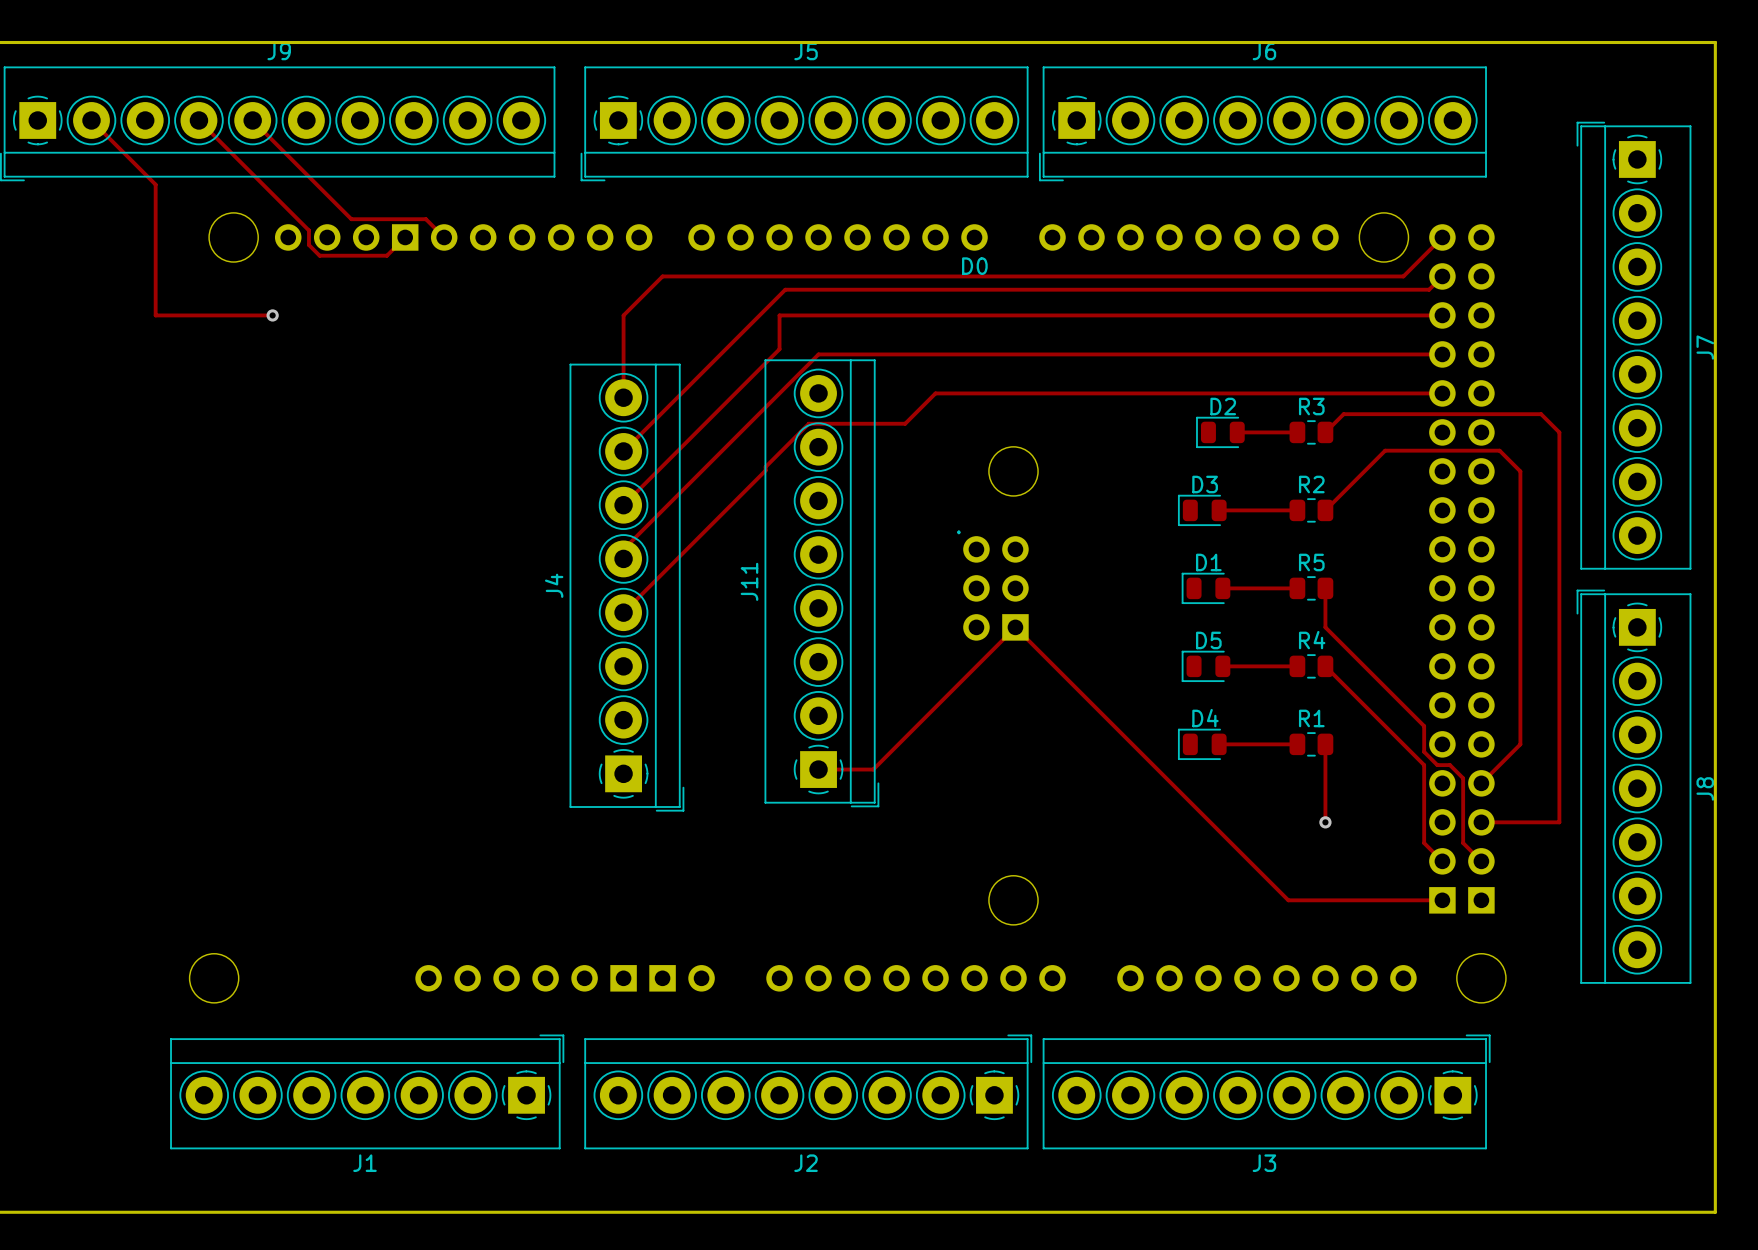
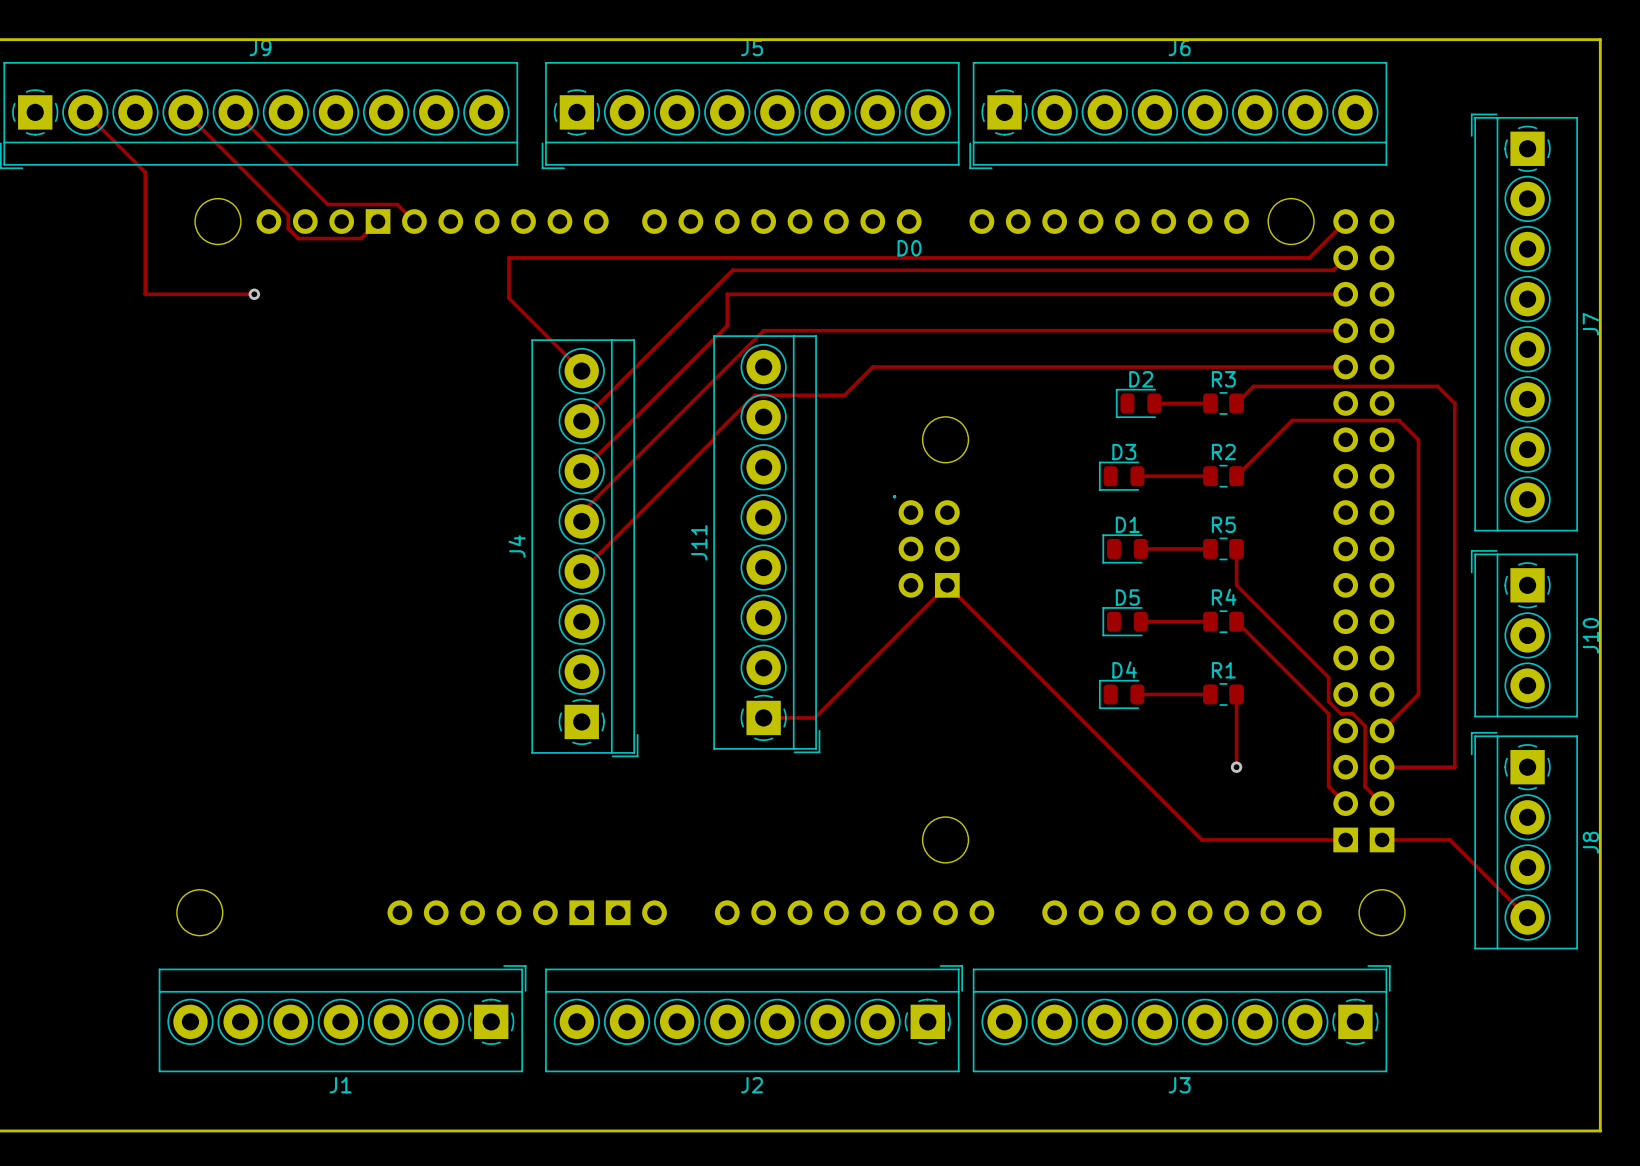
track: (662, 276) (623, 315) (623, 397) -> (618, 257) (509, 257) (509, 298) (581, 371)
J8 footprint: [1576, 589, 1692, 984] -> [1470, 731, 1578, 950]
J10: none -> (1524, 633)
track: none -> (1382, 839) (1449, 839) (1527, 917)

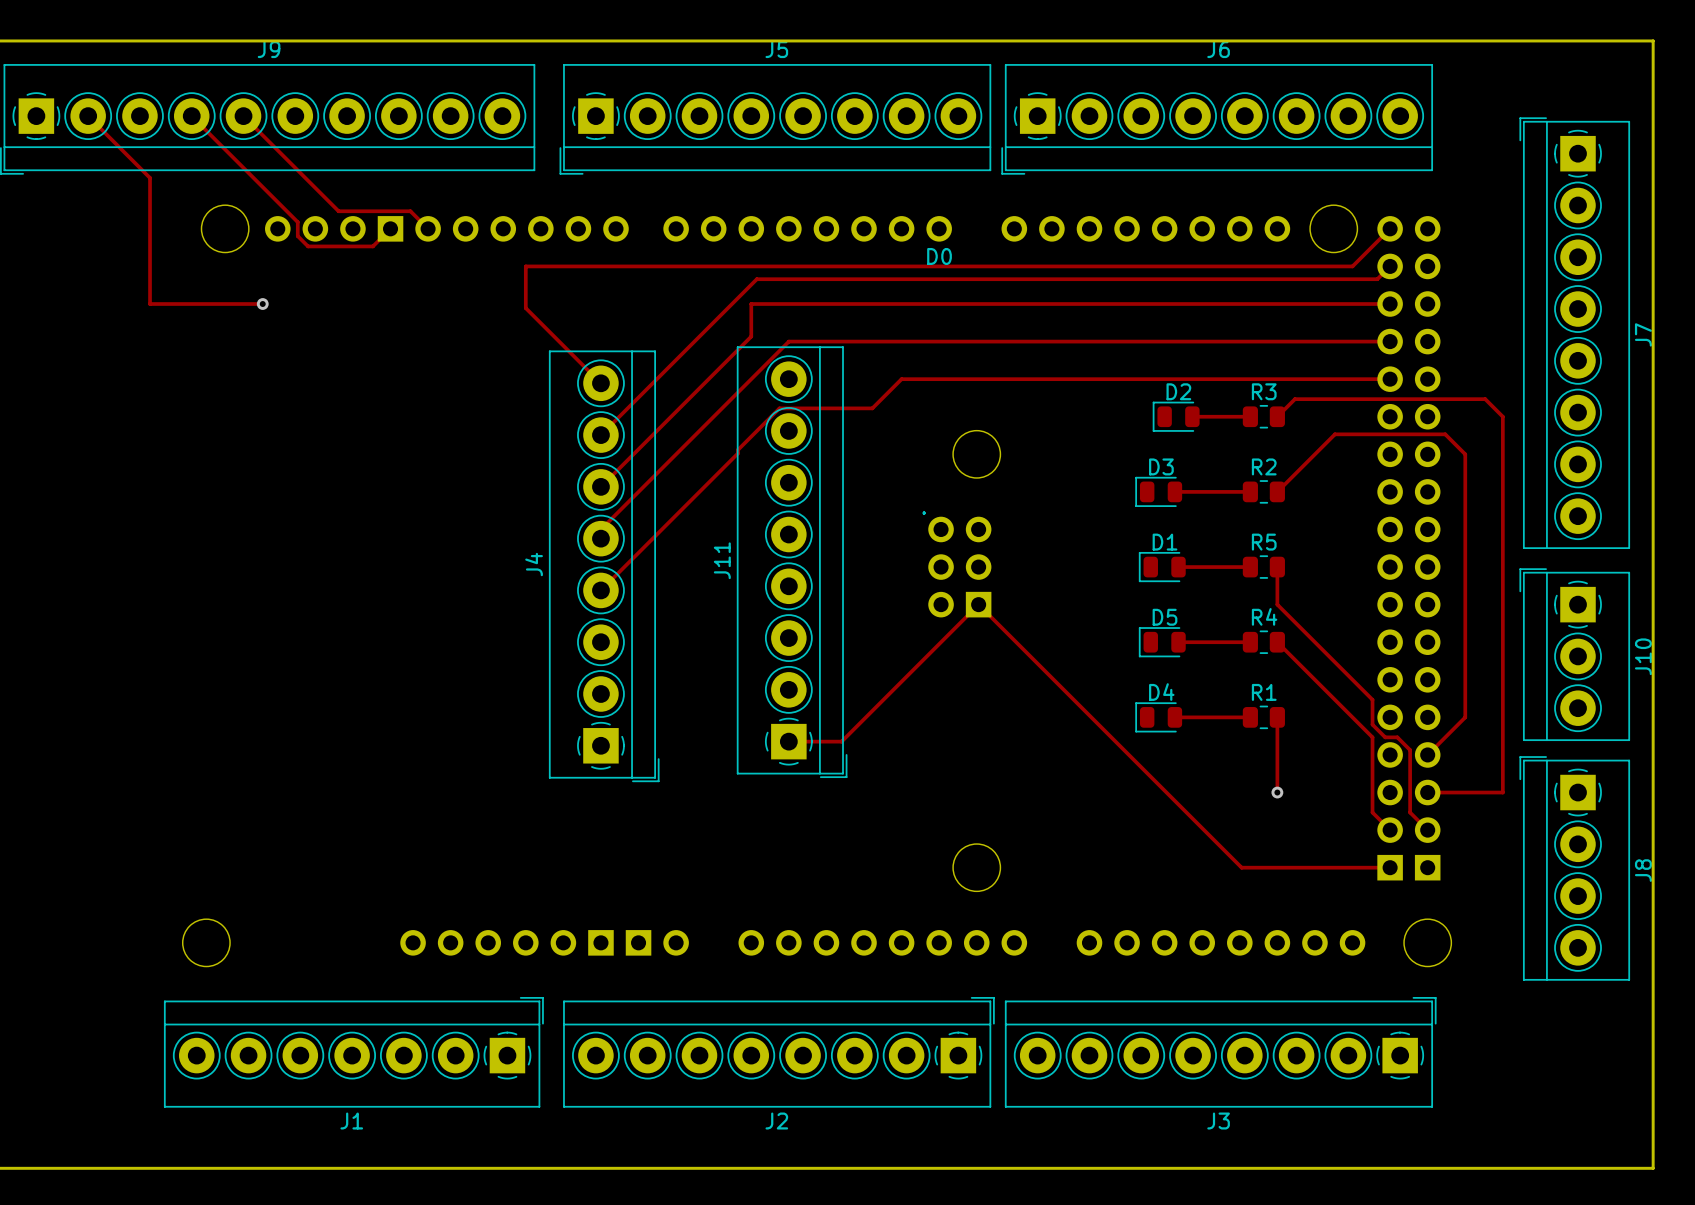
track: (1382, 839) (1449, 839) (1527, 917) -> none

